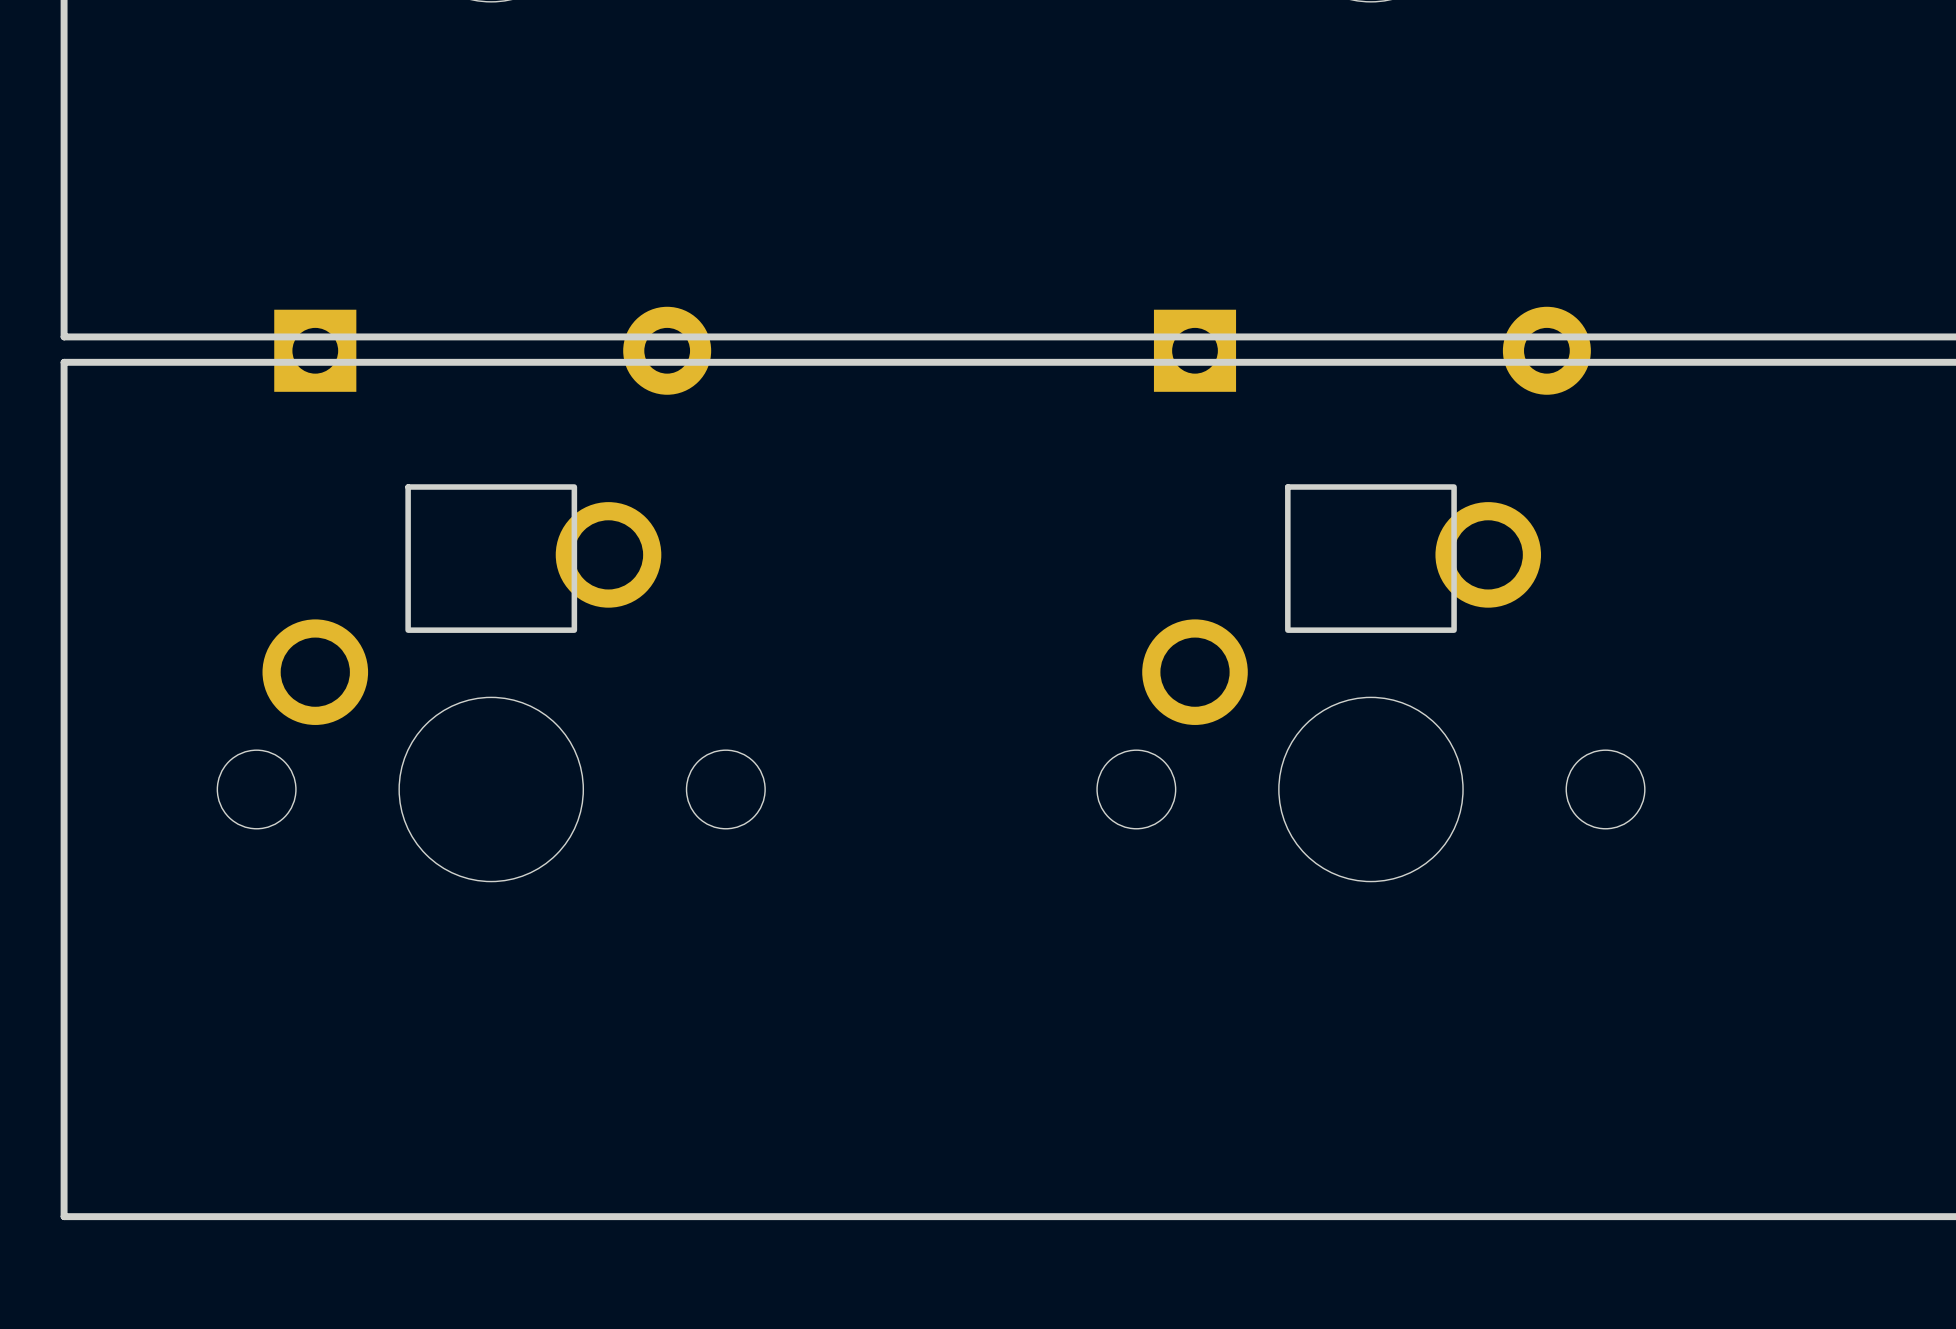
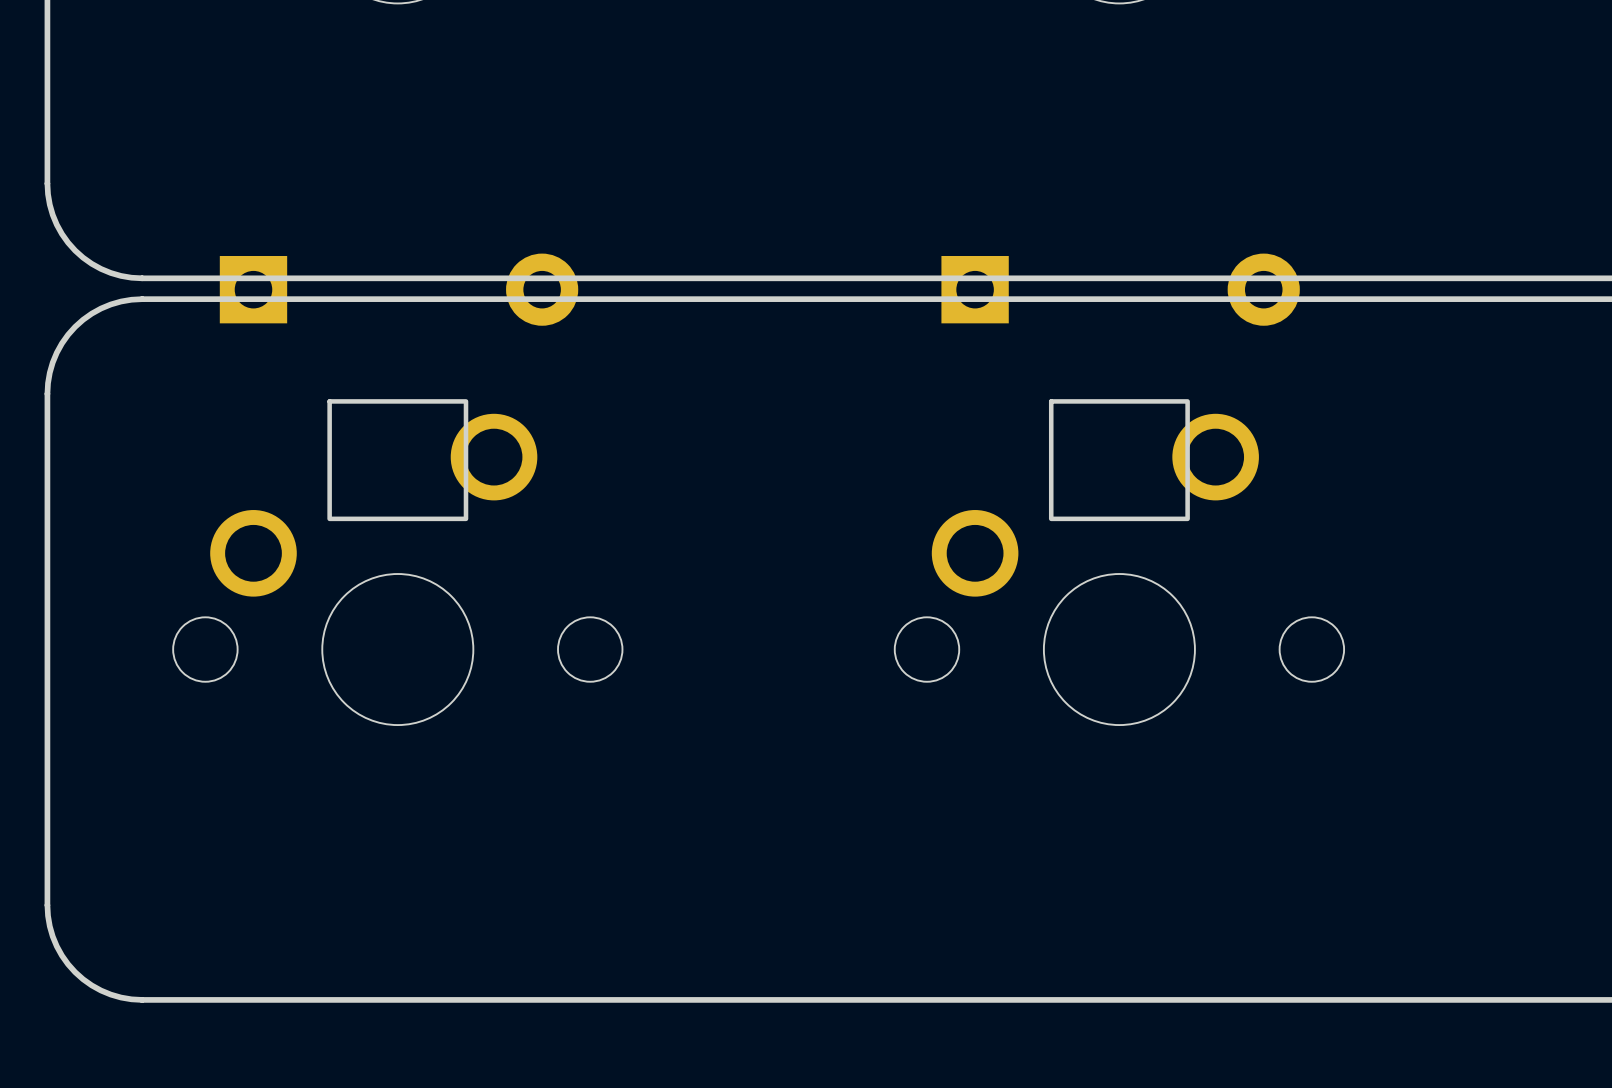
board edge: (64, 221) (64, 336) (179, 336) -> (47, 183) (52, 214) (61, 233) (75, 250) (101, 268) (121, 275) (142, 278)
board edge: (179, 362) (64, 362) (64, 477) -> (142, 299) (121, 301) (101, 308) (75, 326) (61, 343) (52, 362) (47, 393)
board edge: (64, 1101) (64, 1216) (179, 1216) -> (47, 905) (52, 936) (61, 955) (75, 972) (91, 985) (110, 994) (142, 999)

